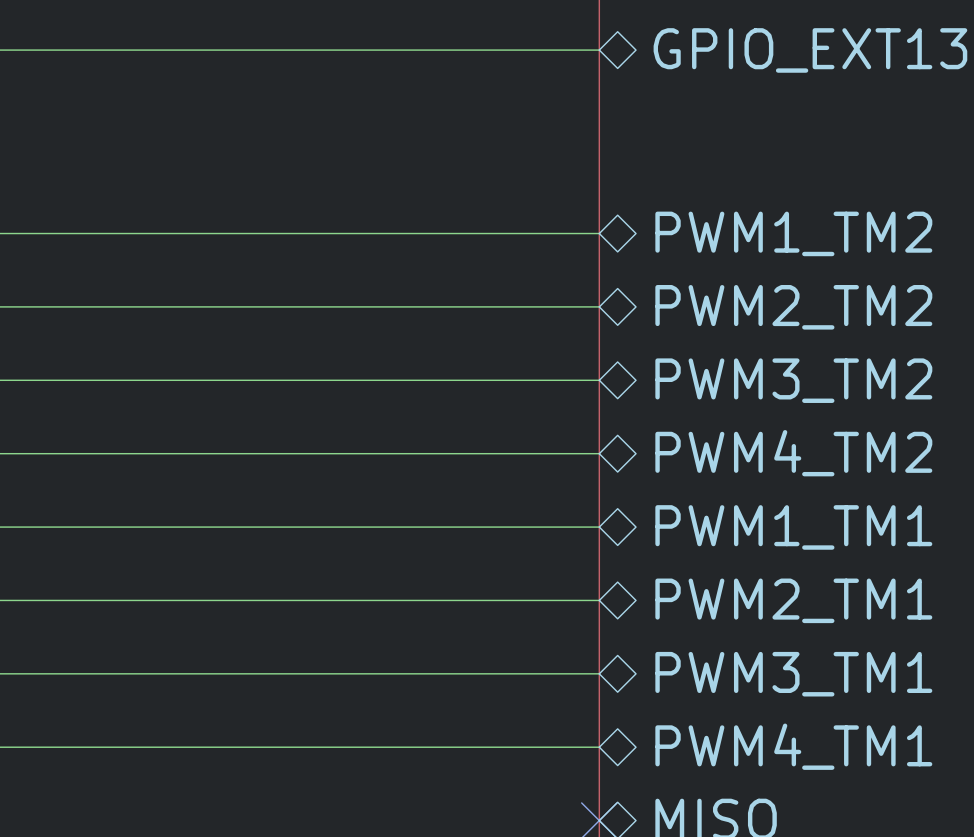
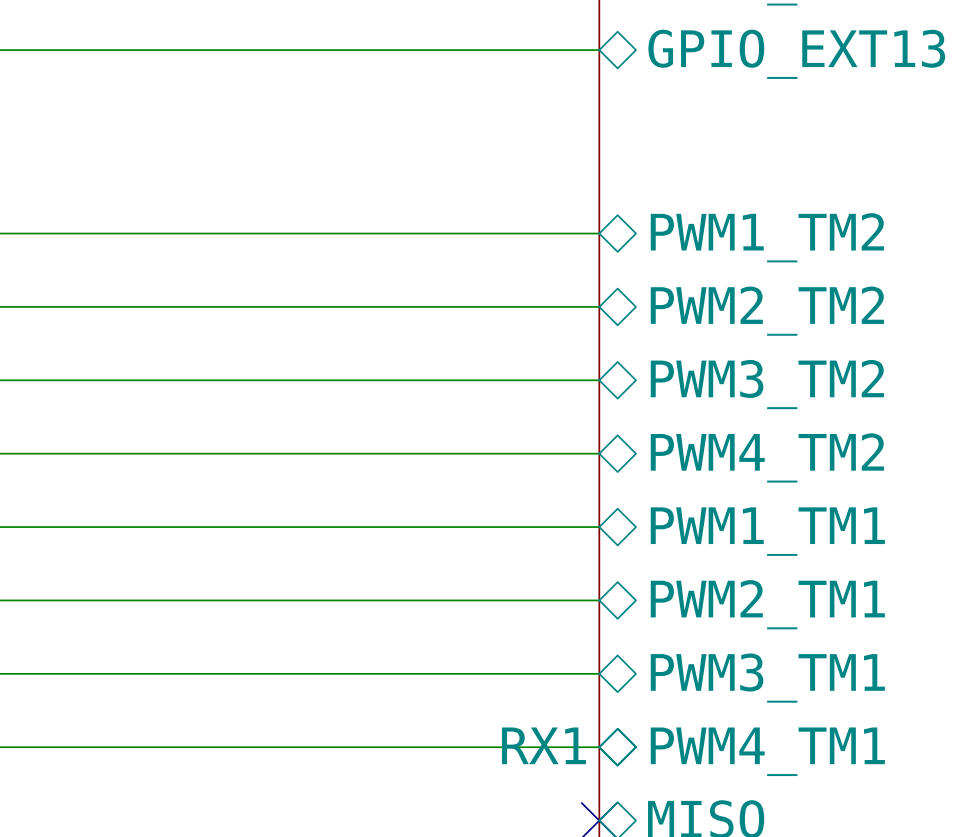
sheet pin: none -> RX1 (544, 745)

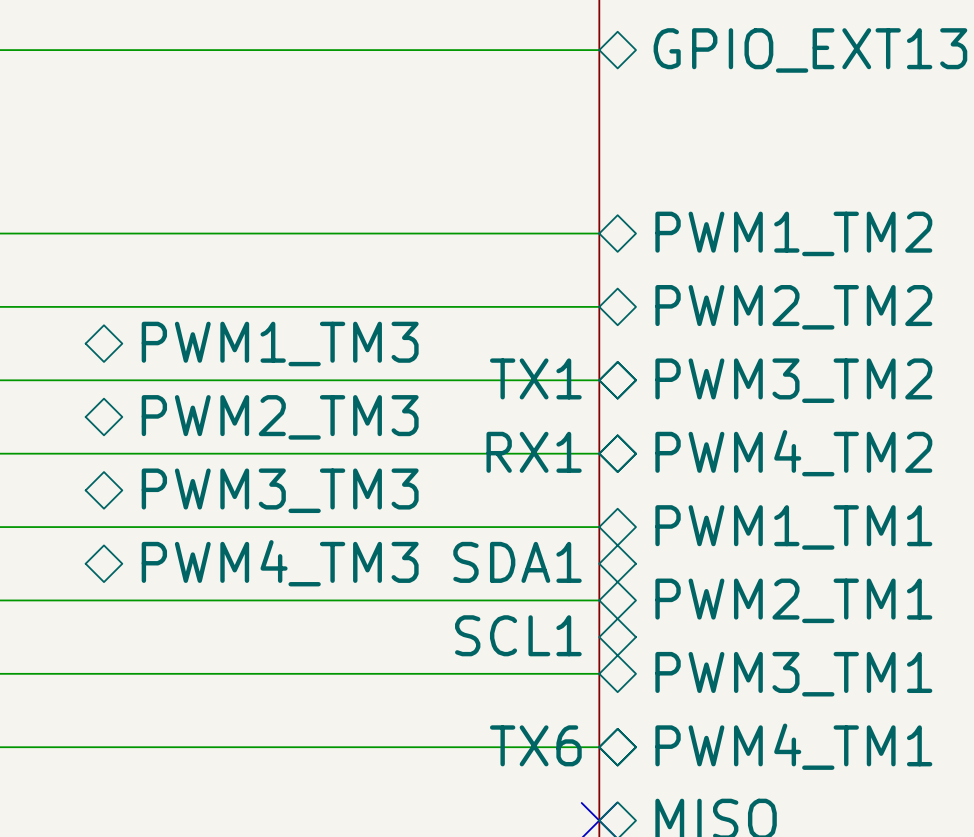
sheet pin: none -> PWM1_TM3 (280, 343)
sheet pin: none -> TX1 (535, 378)
sheet pin: none -> PWM2_TM3 (280, 417)
sheet pin: none -> RX1 (534, 452)
sheet pin: none -> PWM3_TM3 (280, 490)
sheet pin: none -> SDA1 (517, 562)
sheet pin: none -> PWM4_TM3 (280, 563)
sheet pin: none -> SCL1 (518, 635)
sheet pin: RX1 (544, 745) -> TX6 (535, 745)

